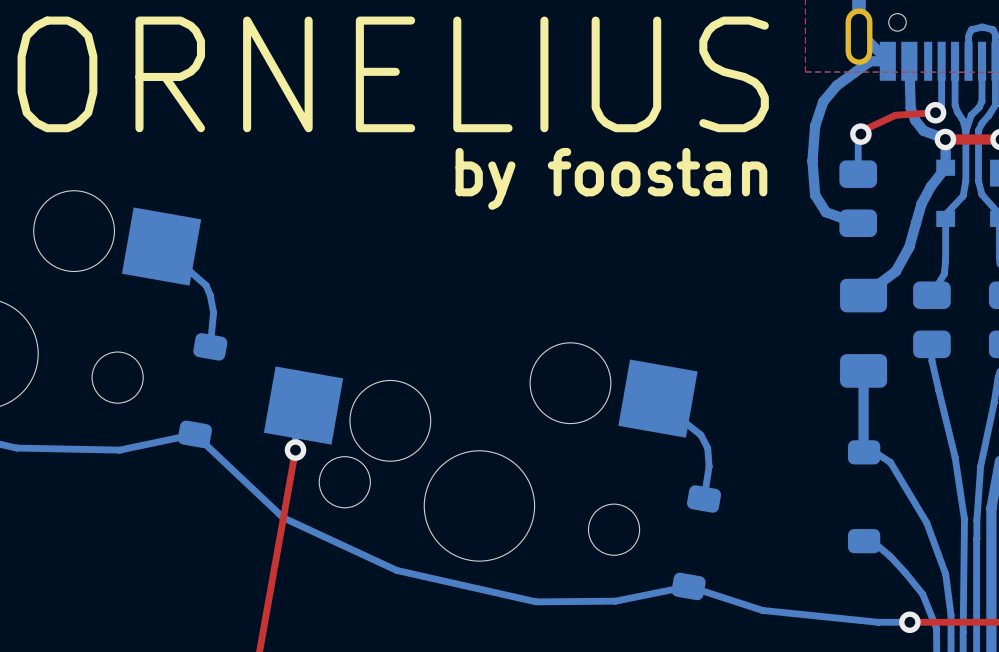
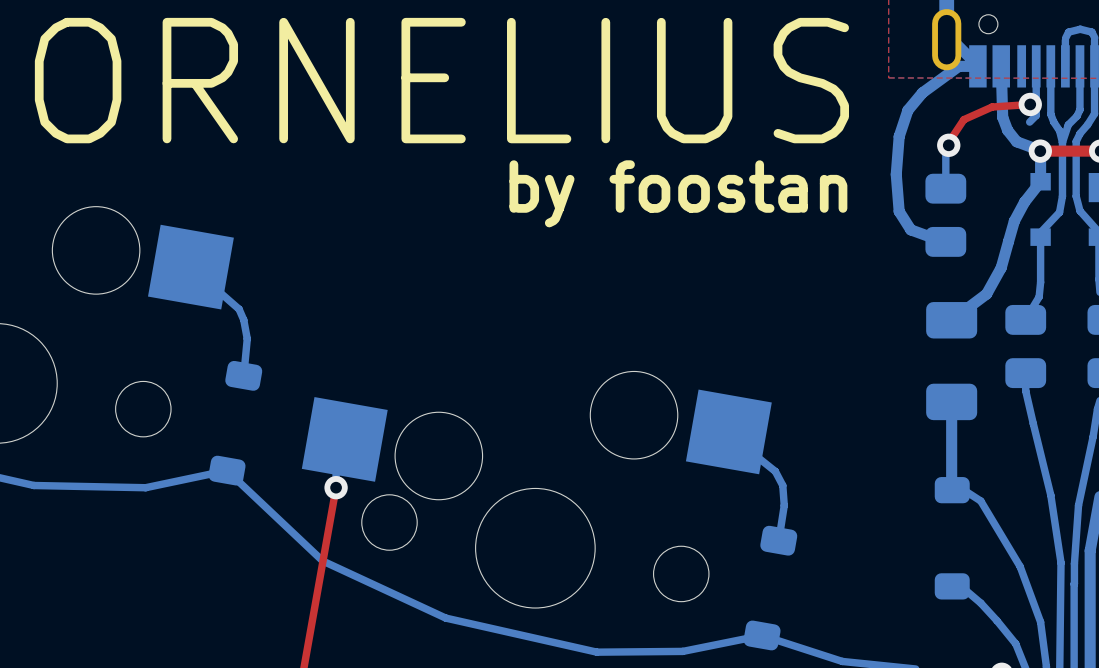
top track: (935, 112) (895, 115) (860, 131) -> (1030, 104) (992, 107) (963, 119) (948, 142)
via position: (935, 112) -> (1030, 104)

